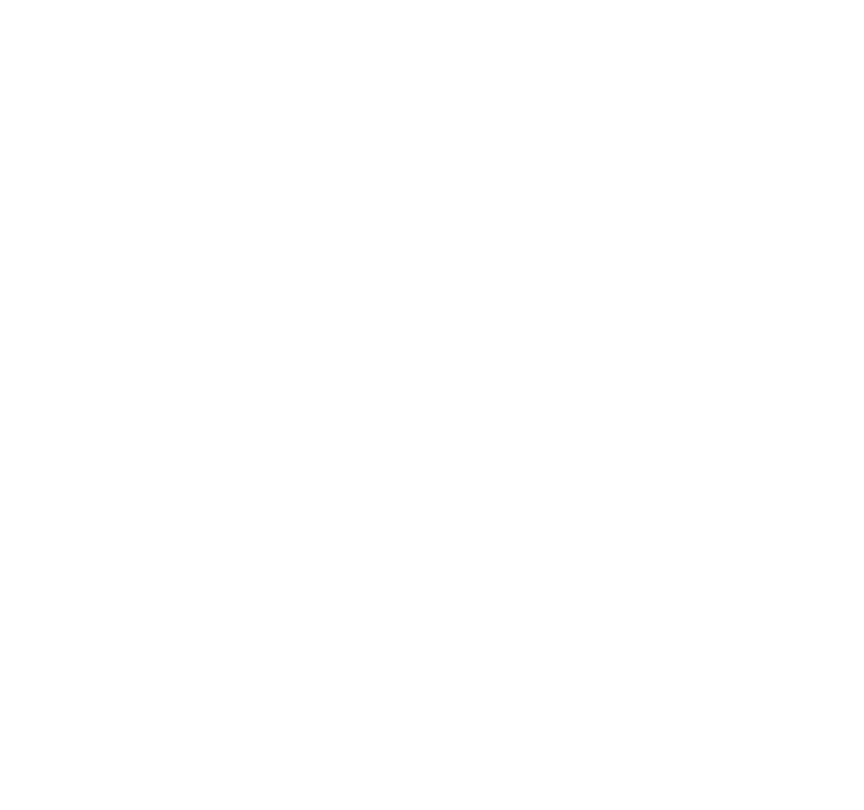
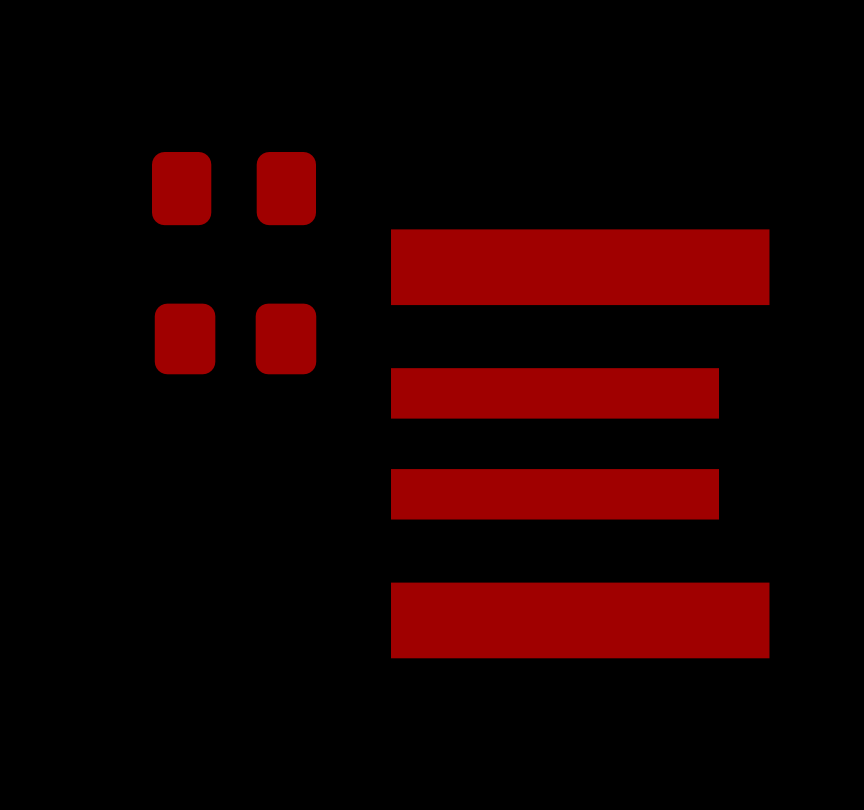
part: none -> (233, 188)
part: none -> (235, 338)
part: none -> (580, 443)

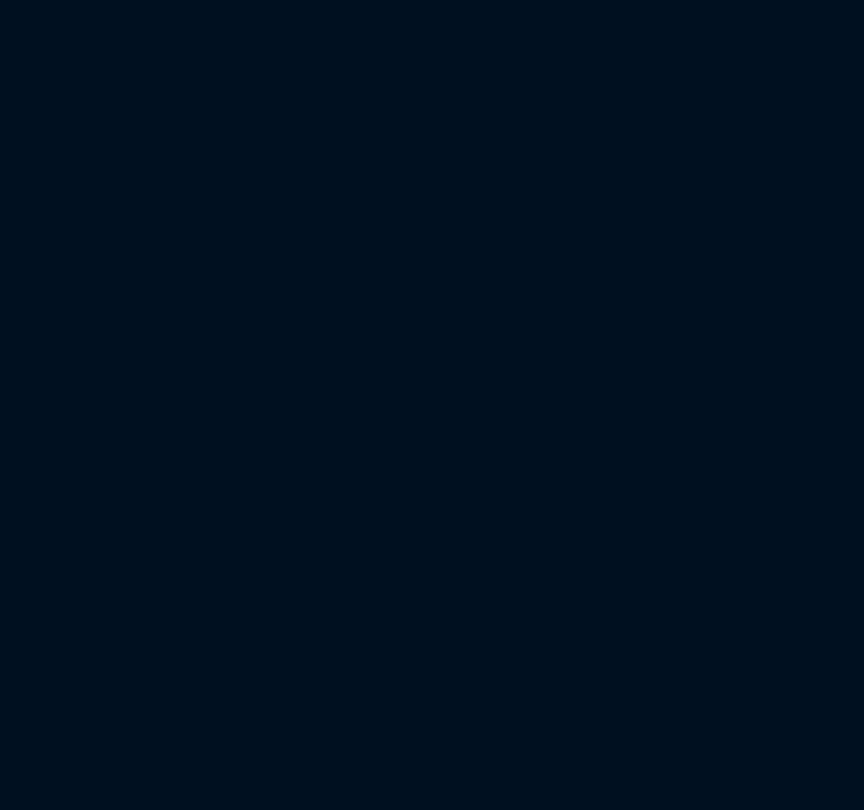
part: (233, 188) -> none
part: (235, 338) -> none
part: (580, 443) -> none

